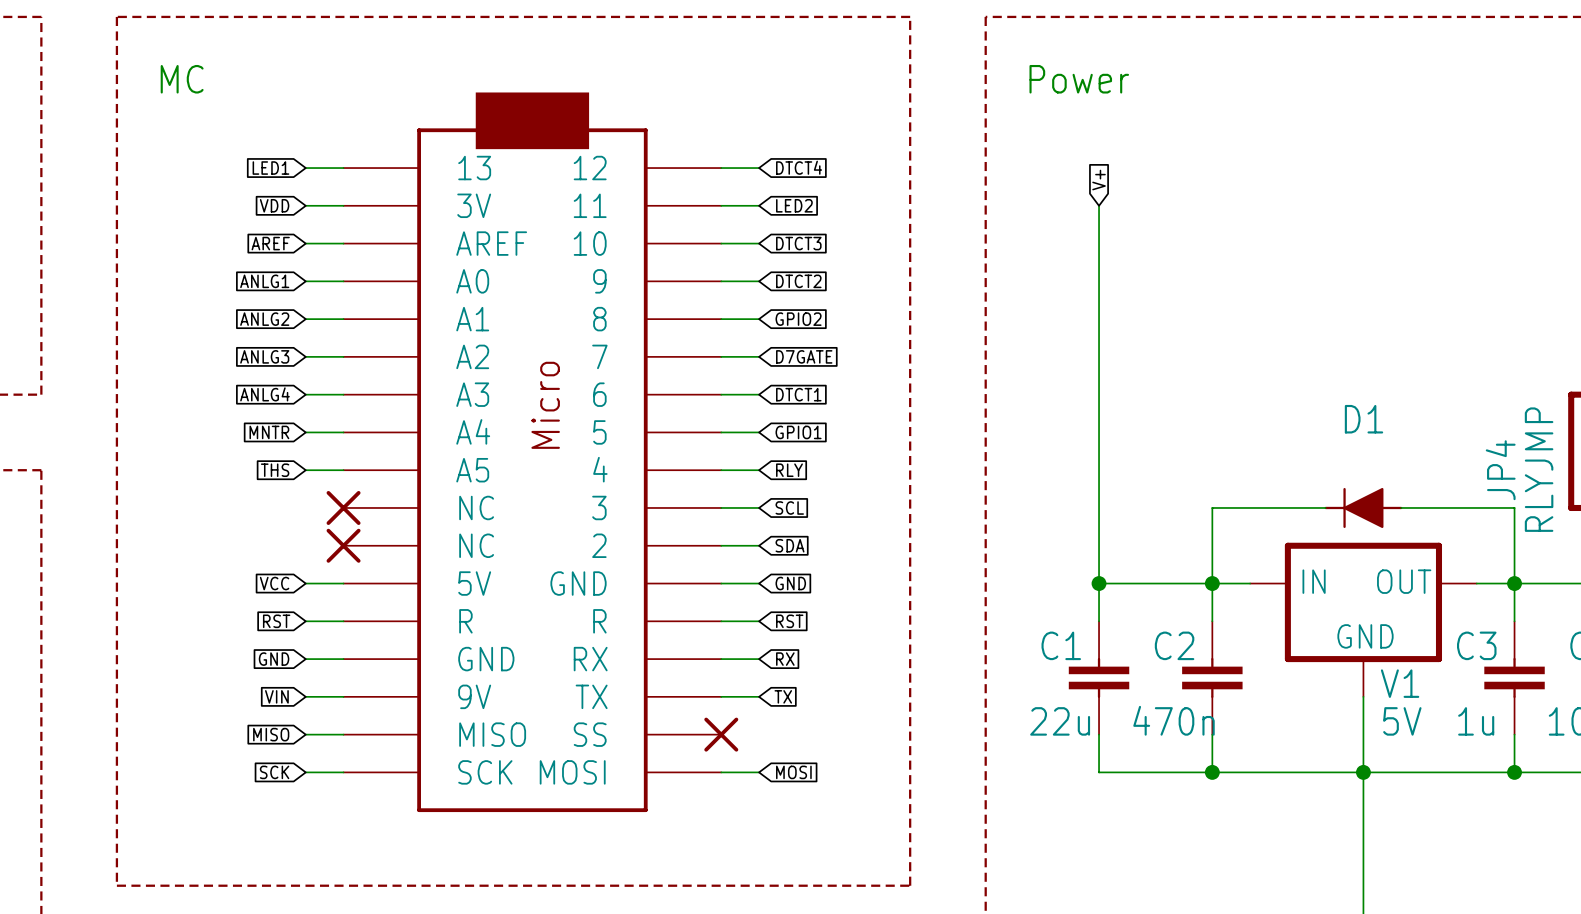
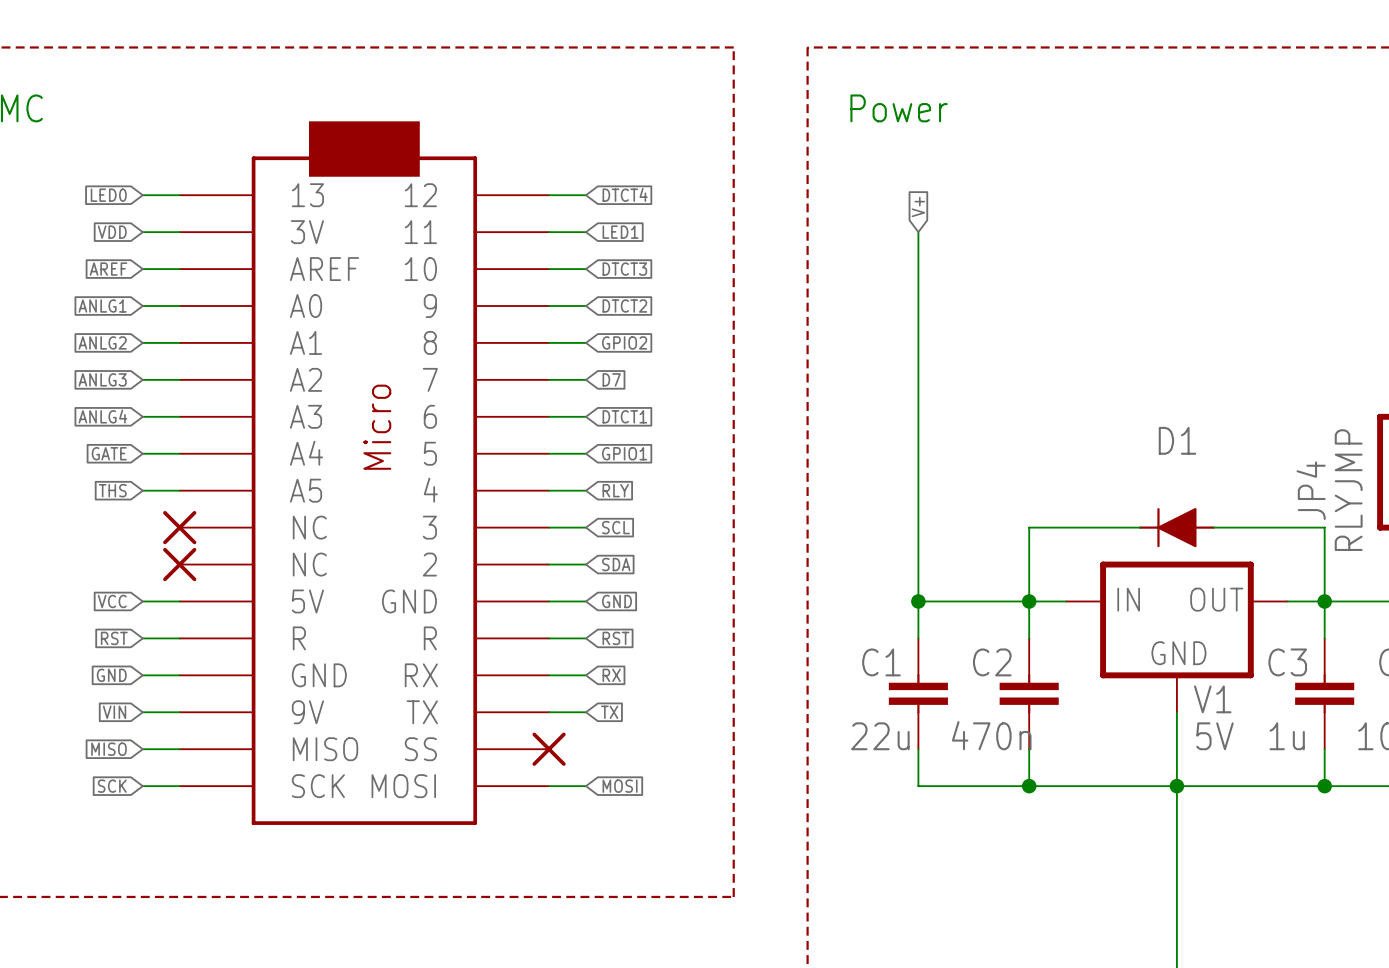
global label: LED1 (270, 168) -> LED0 (108, 195)
global label: LED2 (794, 205) -> LED1 (620, 232)
global label: D7GATE (804, 356) -> D7 (611, 379)
global label: MNTR (269, 432) -> GATE (109, 453)

